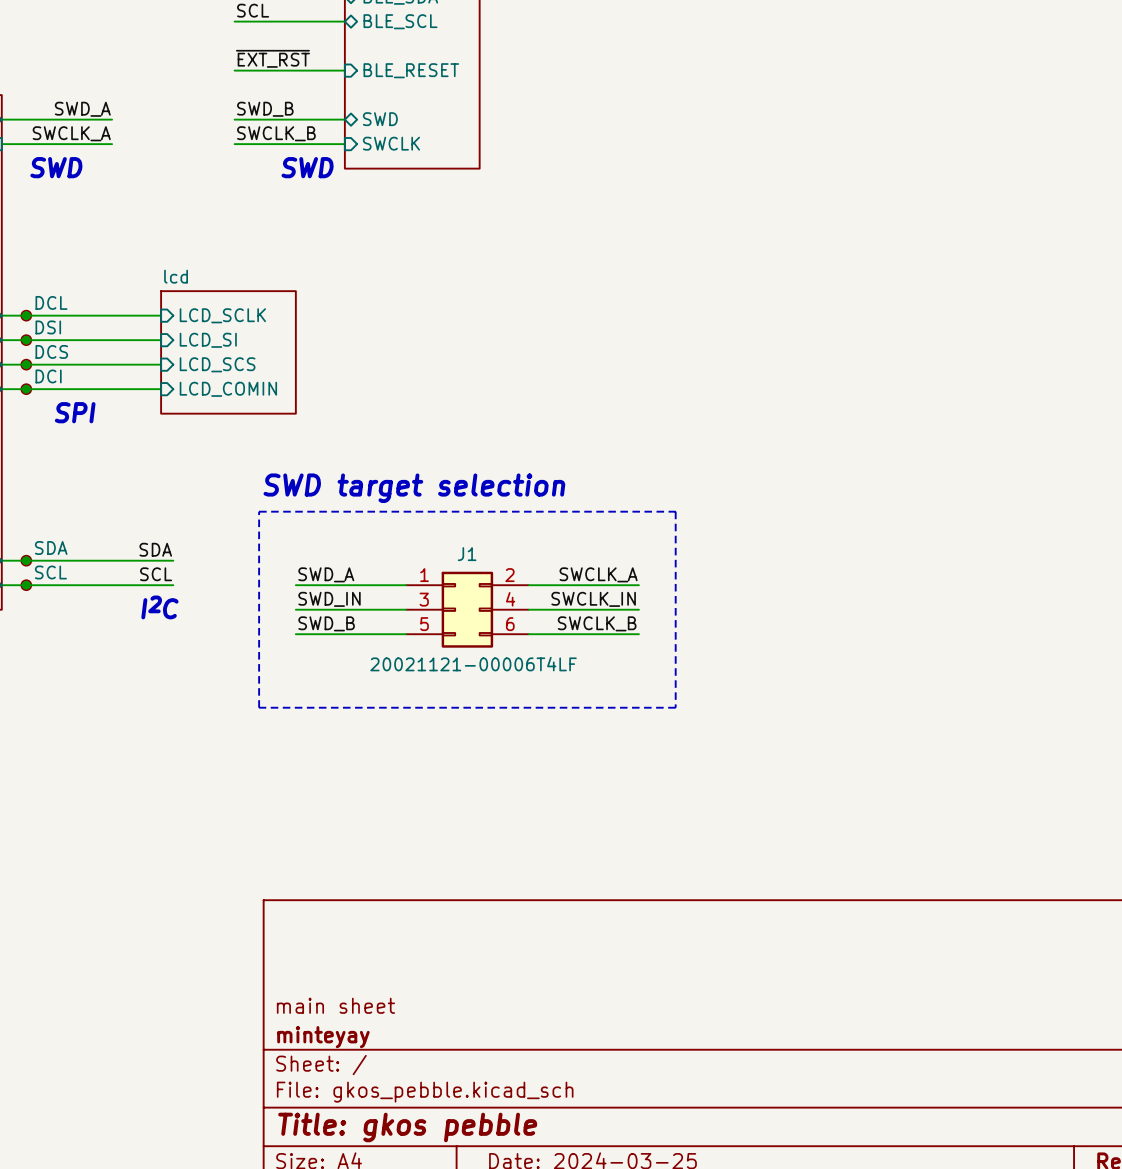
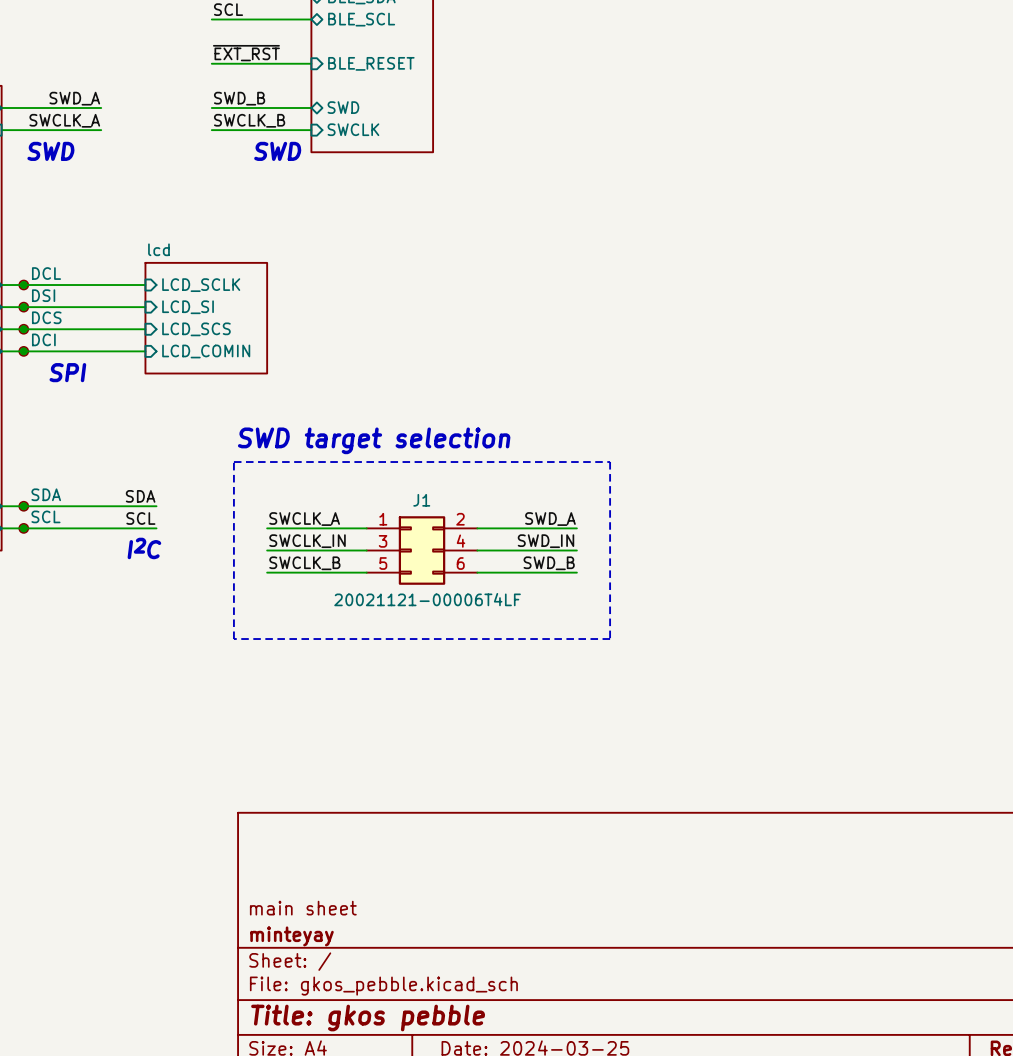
label: SWD_A (326, 574) -> SWCLK_A (304, 519)
label: SWCLK_A (598, 574) -> SWD_A (550, 519)
label: SWD_IN (329, 599) -> SWCLK_IN (307, 541)
label: SWCLK_IN (593, 599) -> SWD_IN (545, 541)
label: SWD_B (326, 623) -> SWCLK_B (304, 563)
label: SWCLK_B (597, 623) -> SWD_B (549, 563)

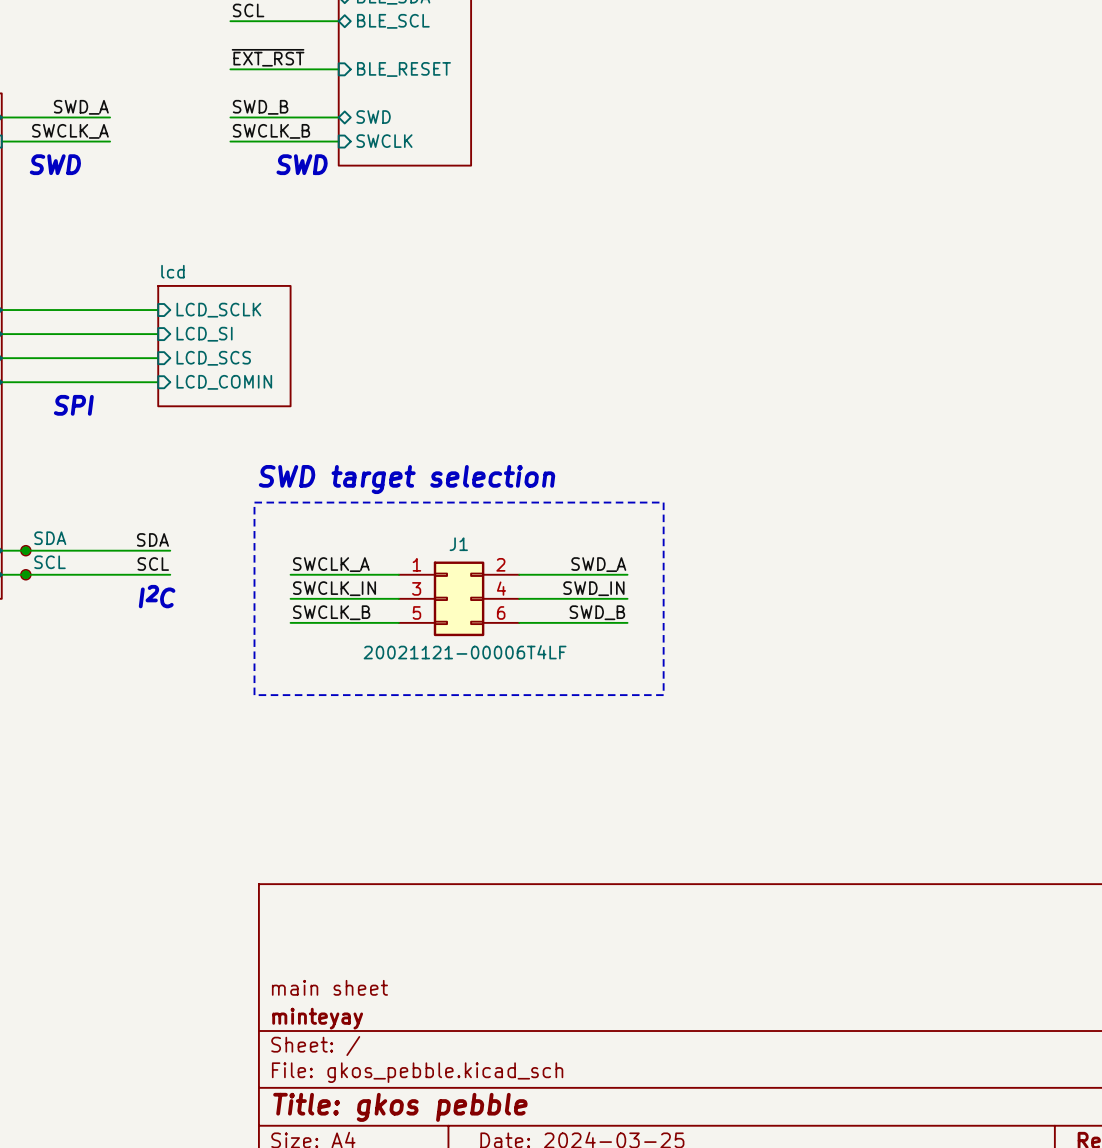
junction: (23, 285) -> none
part: DCL (23, 285) -> none
junction: (23, 307) -> none
part: DSI (23, 307) -> none
junction: (23, 329) -> none
part: DCS (23, 329) -> none
junction: (23, 351) -> none
part: DCI (23, 351) -> none

